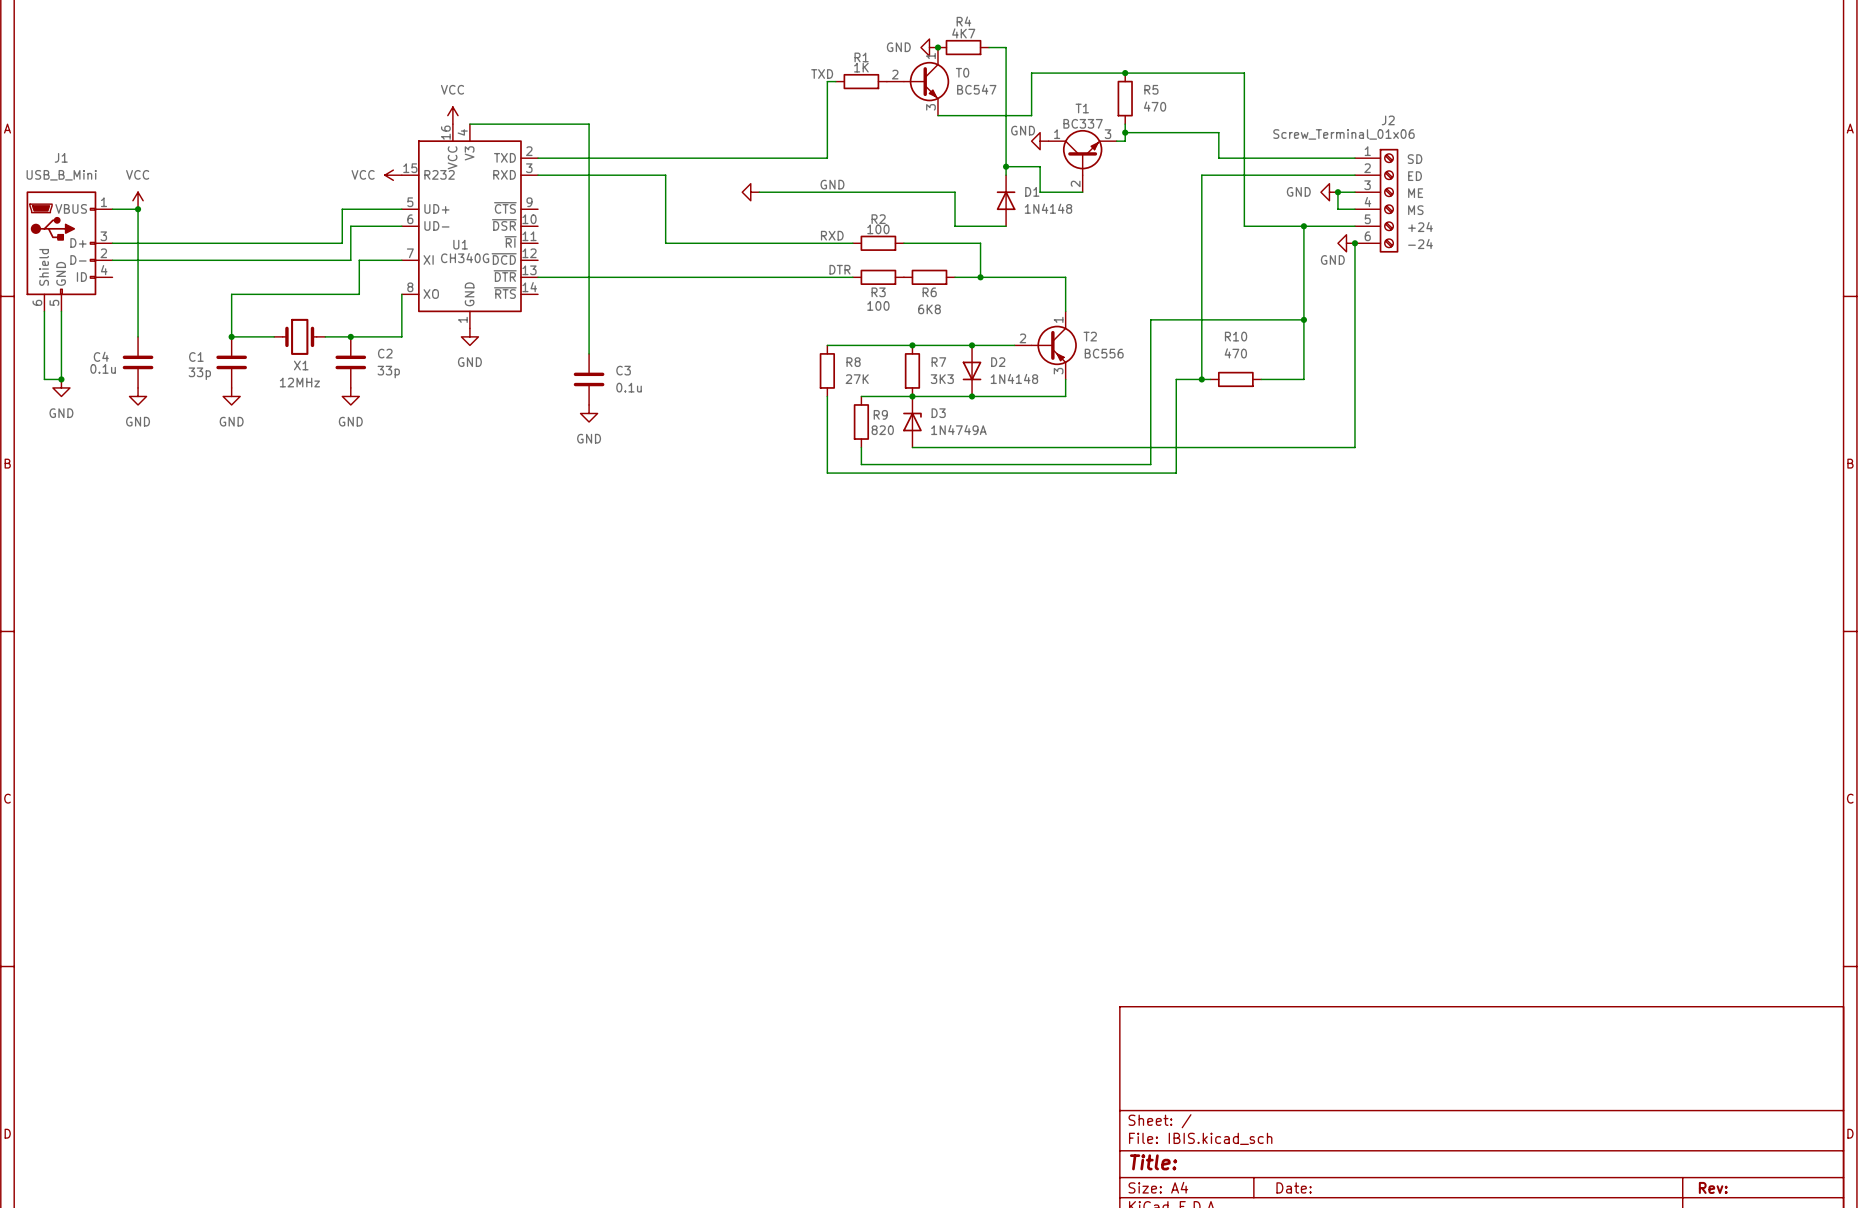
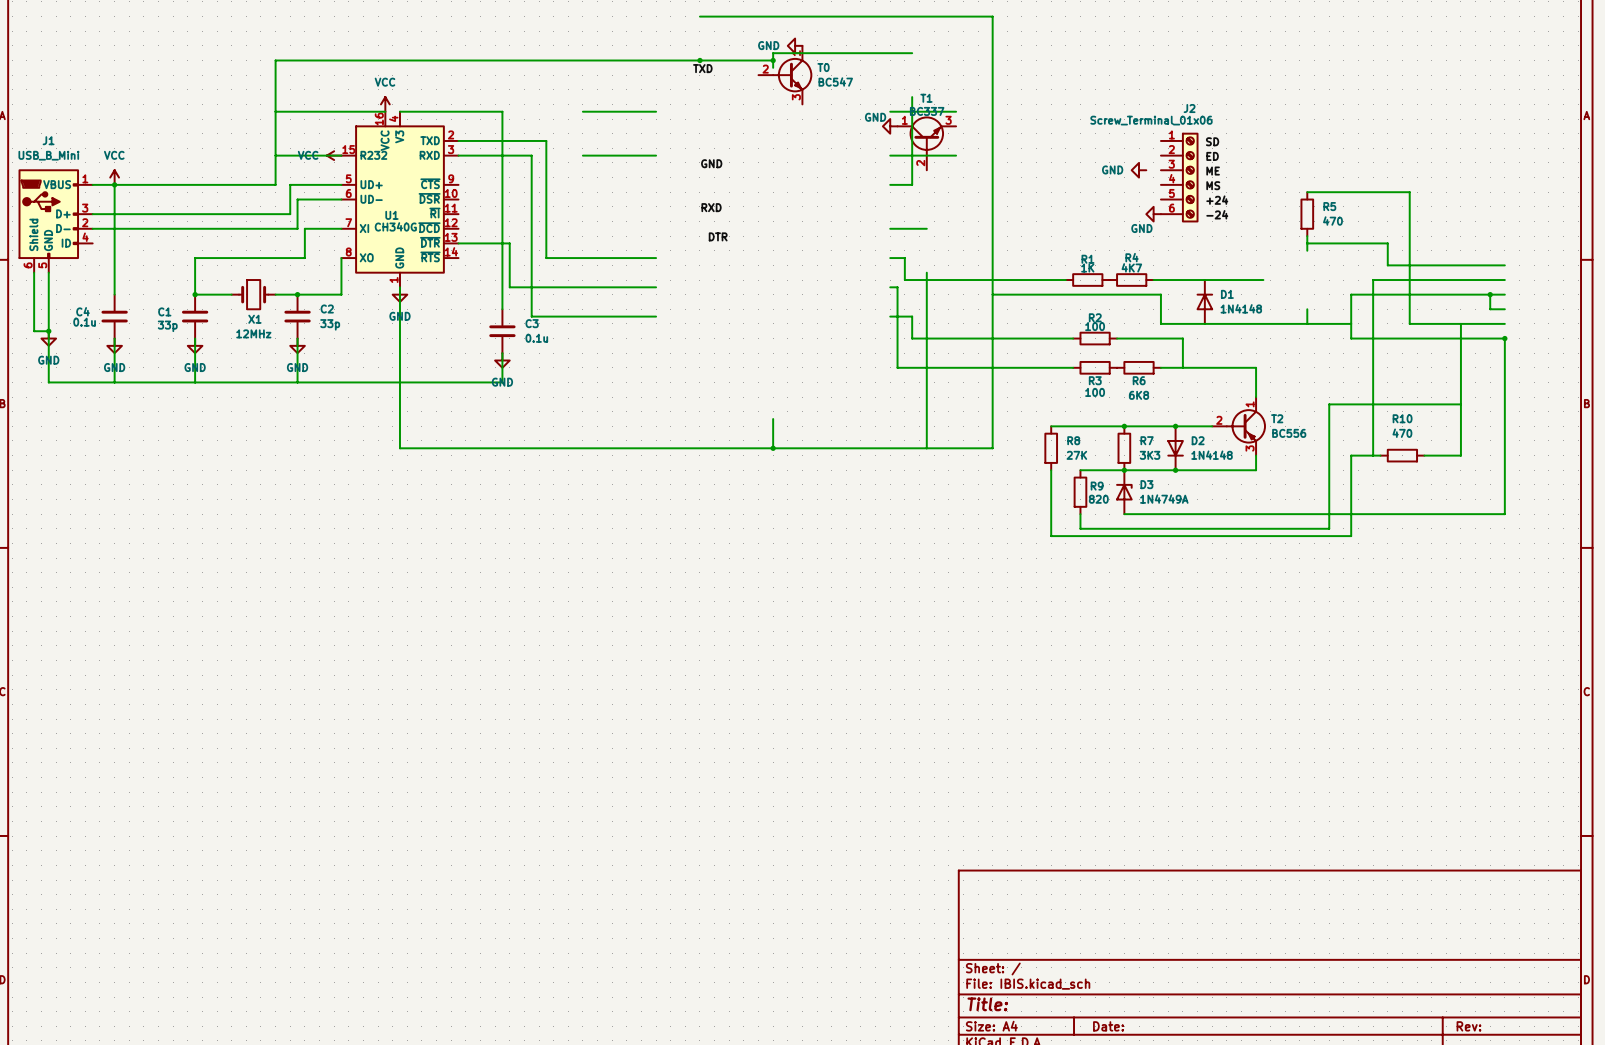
wire: none -> (699, 16) (992, 16) (992, 448) (399, 448) (399, 287)
junction position: (937, 47) -> (773, 60)
R4 position: (963, 47) -> (1131, 280)
wire: (989, 47) (1006, 47) (1006, 175) -> none
wire: none -> (912, 53) (773, 53) (773, 67)
junction: none -> (699, 60)
wire: none -> (773, 60) (275, 60) (275, 184) (114, 184)
junction: (1125, 73) -> none
wire: (835, 81) (827, 81) (827, 158) (640, 158) -> (656, 258) (546, 258) (546, 140)
R1 position: (861, 81) -> (1087, 280)
R5 position: (1125, 98) -> (1307, 214)
wire: none -> (912, 97) (912, 184) (890, 184)
wire: (937, 115) (1031, 115) (1031, 73) (1244, 73) (1244, 226) (1354, 226) -> none
wire: none -> (275, 111) (385, 111)
wire: none -> (582, 111) (656, 111)
wire: none -> (890, 111) (956, 111)
wire: (1125, 124) (1125, 141) (1116, 141) -> none
wire: (1125, 132) (1218, 132) (1218, 158) (1354, 158) -> none
junction: (1125, 132) -> none
wire: (1006, 166) (1040, 166) (1040, 192) (1082, 192) -> none
junction: (1006, 166) -> none
wire: none -> (275, 155) (341, 155)
wire: (623, 175) (665, 175) (665, 243) (852, 243) -> (531, 155) (531, 316) (656, 316)
wire: none -> (582, 155) (656, 155)
wire: none -> (890, 155) (956, 155)
wire: (1354, 175) (1201, 175) (1201, 379) -> none
power symbol: (750, 192) -> none
wire: (759, 192) (955, 192) (955, 226) (1006, 226) -> none
junction: (1337, 192) -> none
wire: (1354, 192) (1337, 192) (1337, 209) (1354, 209) -> none
D1 position: (1006, 200) -> (1204, 301)
wire: none -> (1307, 192) (1409, 192) (1409, 323) (1504, 323)
wire: (1303, 226) (1303, 379) (1261, 379) -> none
junction: (1303, 226) -> none
R2 position: (878, 243) -> (1095, 338)
wire: (903, 243) (980, 243) (980, 277) -> none
wire: (1354, 243) (1354, 336) -> (992, 294) (1160, 294)
junction: (1354, 243) -> none
wire: none -> (890, 228) (926, 228)
wire: none -> (1307, 236) (1307, 250)
wire: (597, 277) (852, 277) -> (509, 243) (509, 287) (656, 287)
R3 position: (878, 277) -> (1095, 367)
R6 position: (929, 277) -> (1139, 367)
wire: (955, 277) (1065, 277) (1065, 311) -> none
junction: (980, 277) -> none
wire: none -> (1307, 243) (1387, 243) (1387, 265) (1504, 265)
wire: none -> (926, 272) (926, 448)
wire: (1150, 319) (1150, 464) (861, 464) (861, 447) -> (985, 280) (904, 280) (904, 258) (890, 258)
wire: (1244, 319) (1303, 319) -> none
junction: (1303, 319) -> none
wire: none -> (1153, 280) (1263, 280)
wire: none -> (1504, 280) (1373, 280) (1373, 455)
wire: none -> (890, 287) (897, 287) (897, 367) (1073, 367)
wire: none -> (1490, 294) (1490, 309) (1504, 309)
junction: none -> (1490, 294)
wire: none -> (1504, 294) (1351, 294) (1351, 338) (1504, 338) (1504, 514) (1124, 514)
wire: (827, 345) (1014, 345) -> none
junction: (912, 345) -> none
junction: (972, 345) -> none
T2 position: (1045, 345) -> (1238, 426)
wire: none -> (1307, 309) (1307, 323)
R8 position: (827, 370) -> (1051, 448)
R7 position: (912, 370) -> (1124, 448)
D2 position: (972, 370) -> (1175, 448)
wire: (1354, 370) (1354, 447) (912, 447) -> (1160, 323) (1351, 323)
wire: none -> (1460, 323) (1460, 455) (1424, 455)
wire: none -> (48, 331) (48, 382) (502, 382) (502, 353)
junction: (1201, 379) -> none
wire: (1210, 379) (1176, 379) (1176, 473) (827, 473) (827, 396) -> none
R10 position: (1235, 379) -> (1402, 455)
wire: none -> (114, 338) (114, 382)
wire: none -> (195, 338) (195, 382)
wire: none -> (297, 338) (297, 382)
wire: (1065, 387) (1065, 396) (861, 396) -> (912, 338) (1073, 338)
wire: none -> (1117, 338) (1182, 338) (1182, 367)
junction: none -> (1504, 338)
junction: (912, 396) -> none
junction: (972, 396) -> none
R9 position: (861, 422) -> (1080, 492)
D3 position: (912, 422) -> (1124, 492)
wire: none -> (1160, 367) (1256, 367) (1256, 397)
wire: none -> (1460, 404) (1329, 404) (1329, 528) (1080, 528) (1080, 514)
wire: none -> (773, 419) (773, 448)
wire: none -> (1051, 426) (1212, 426)
junction: none -> (1124, 426)
junction: none -> (1175, 426)
junction: none -> (773, 448)
wire: none -> (1256, 455) (1256, 470) (1080, 470)
wire: none -> (1380, 455) (1351, 455) (1351, 536) (1051, 536) (1051, 470)
junction: none -> (1124, 470)
junction: none -> (1175, 470)

